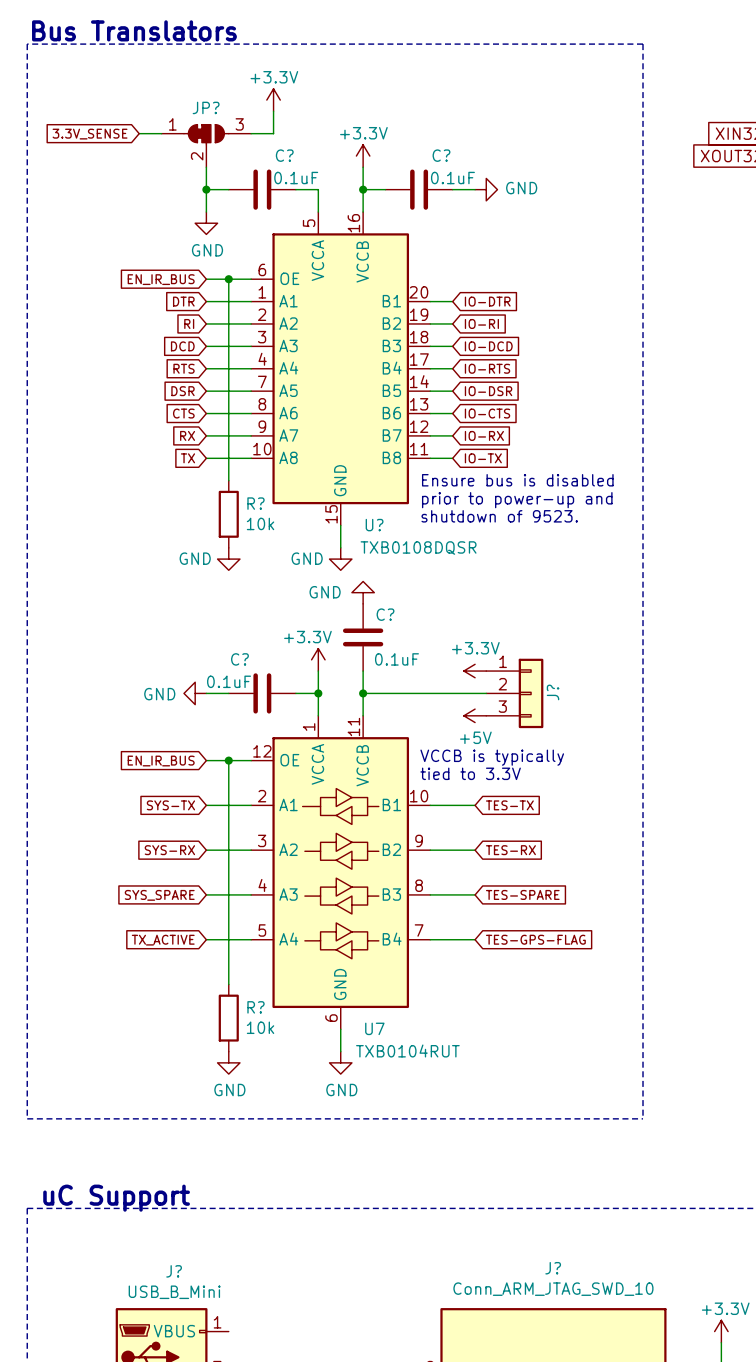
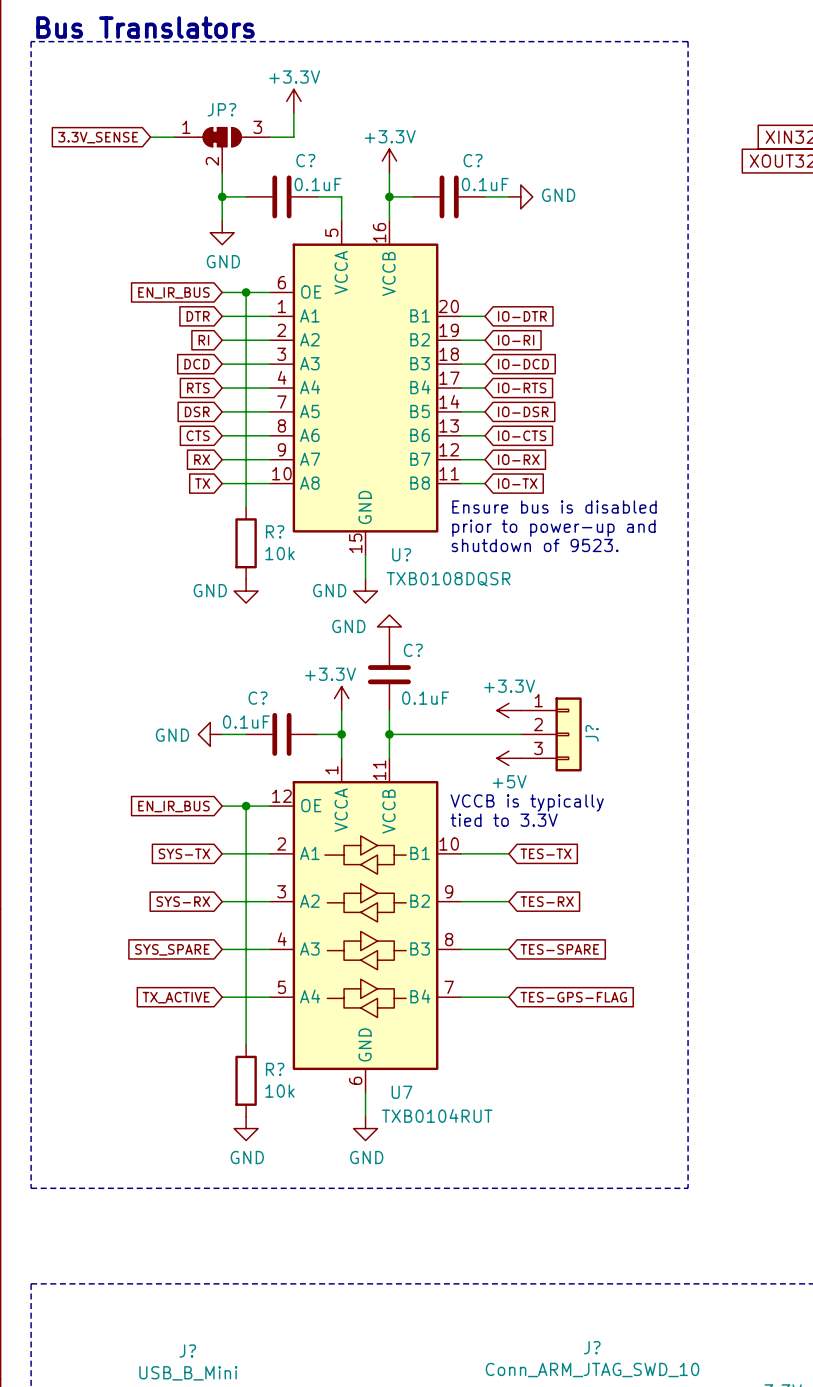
text: uC Support (116, 1198) -> none

